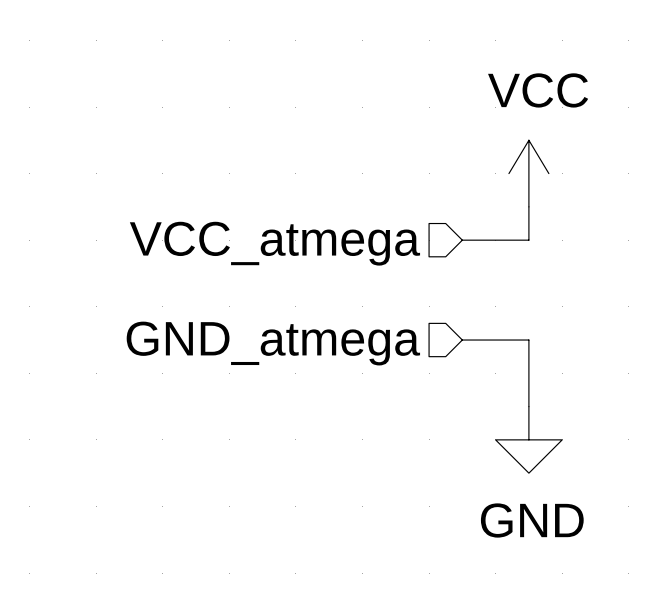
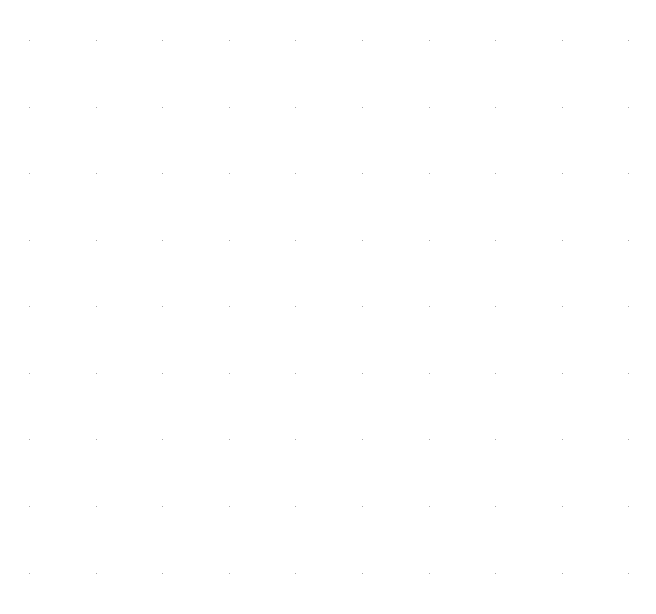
power symbol: VCC (528, 173) -> none
wire: (528, 206) (528, 240) (462, 240) -> none
hierarchical label: VCC_atmega (274, 243) -> none
wire: (462, 340) (528, 340) (528, 406) -> none
hierarchical label: GND_atmega (273, 343) -> none
power symbol: GND (528, 439) -> none

